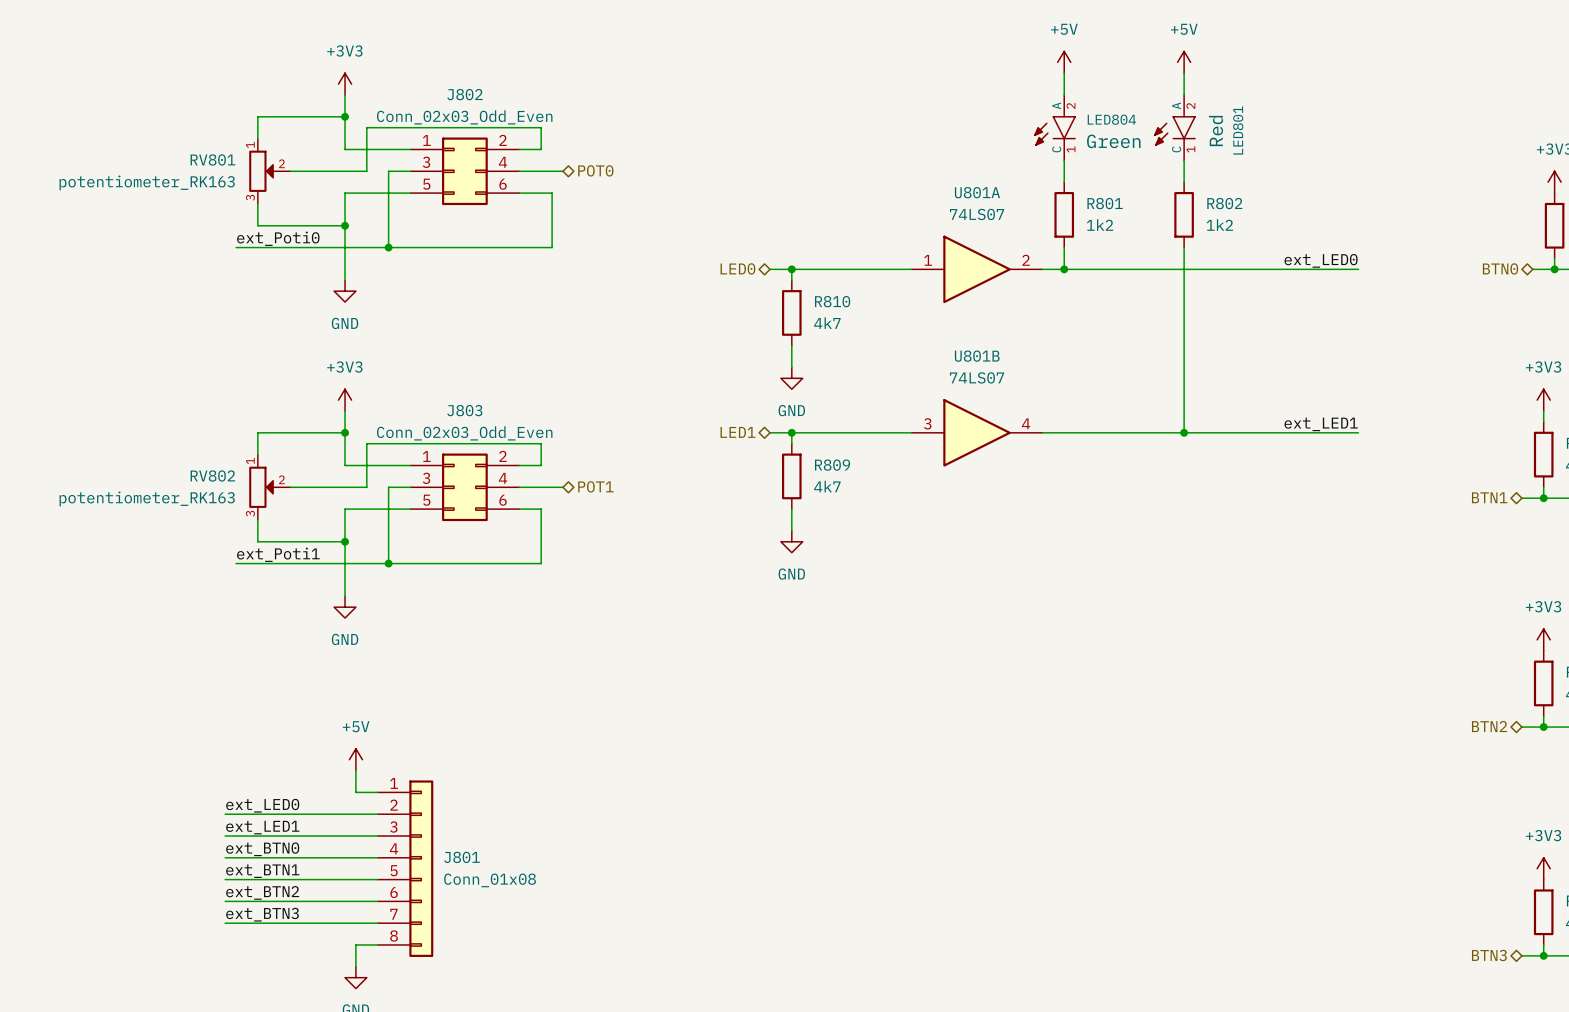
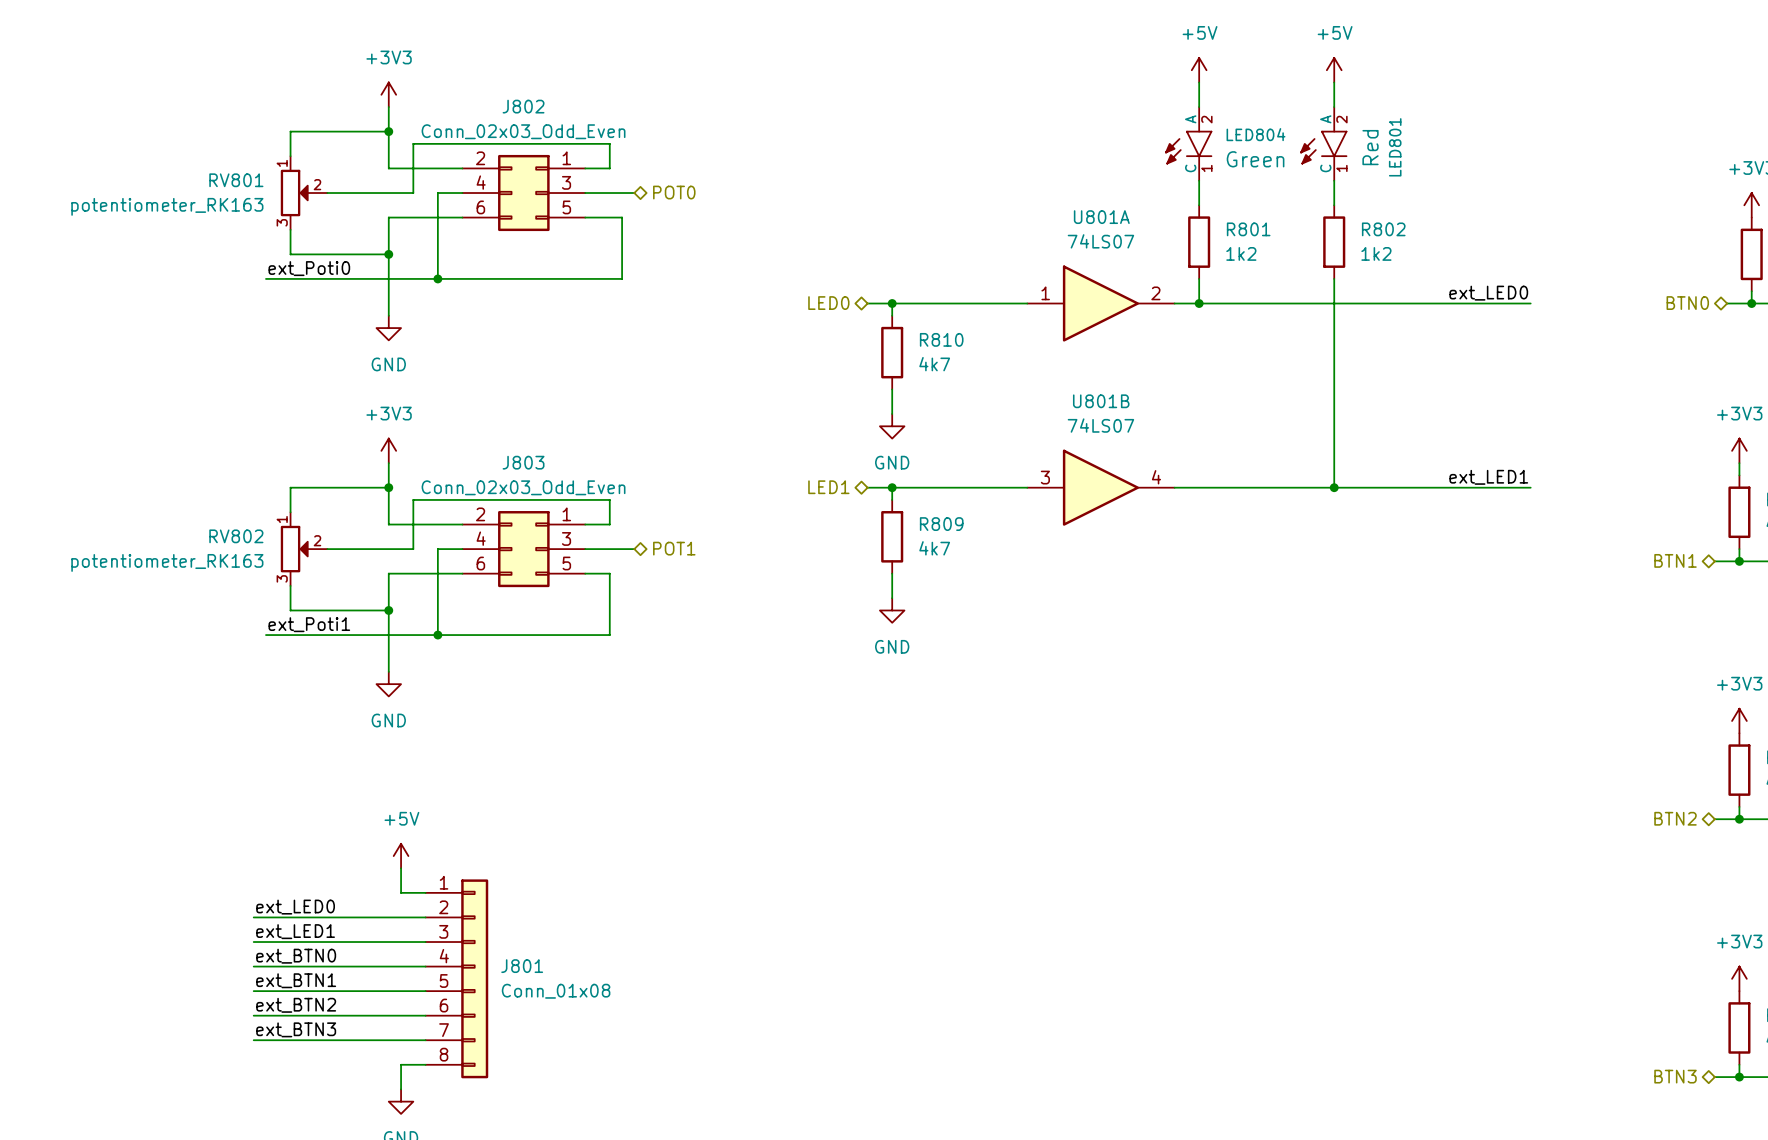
J802 flip: as is (464, 171) -> left-right (523, 193)
J803 flip: as is (464, 487) -> left-right (523, 549)

